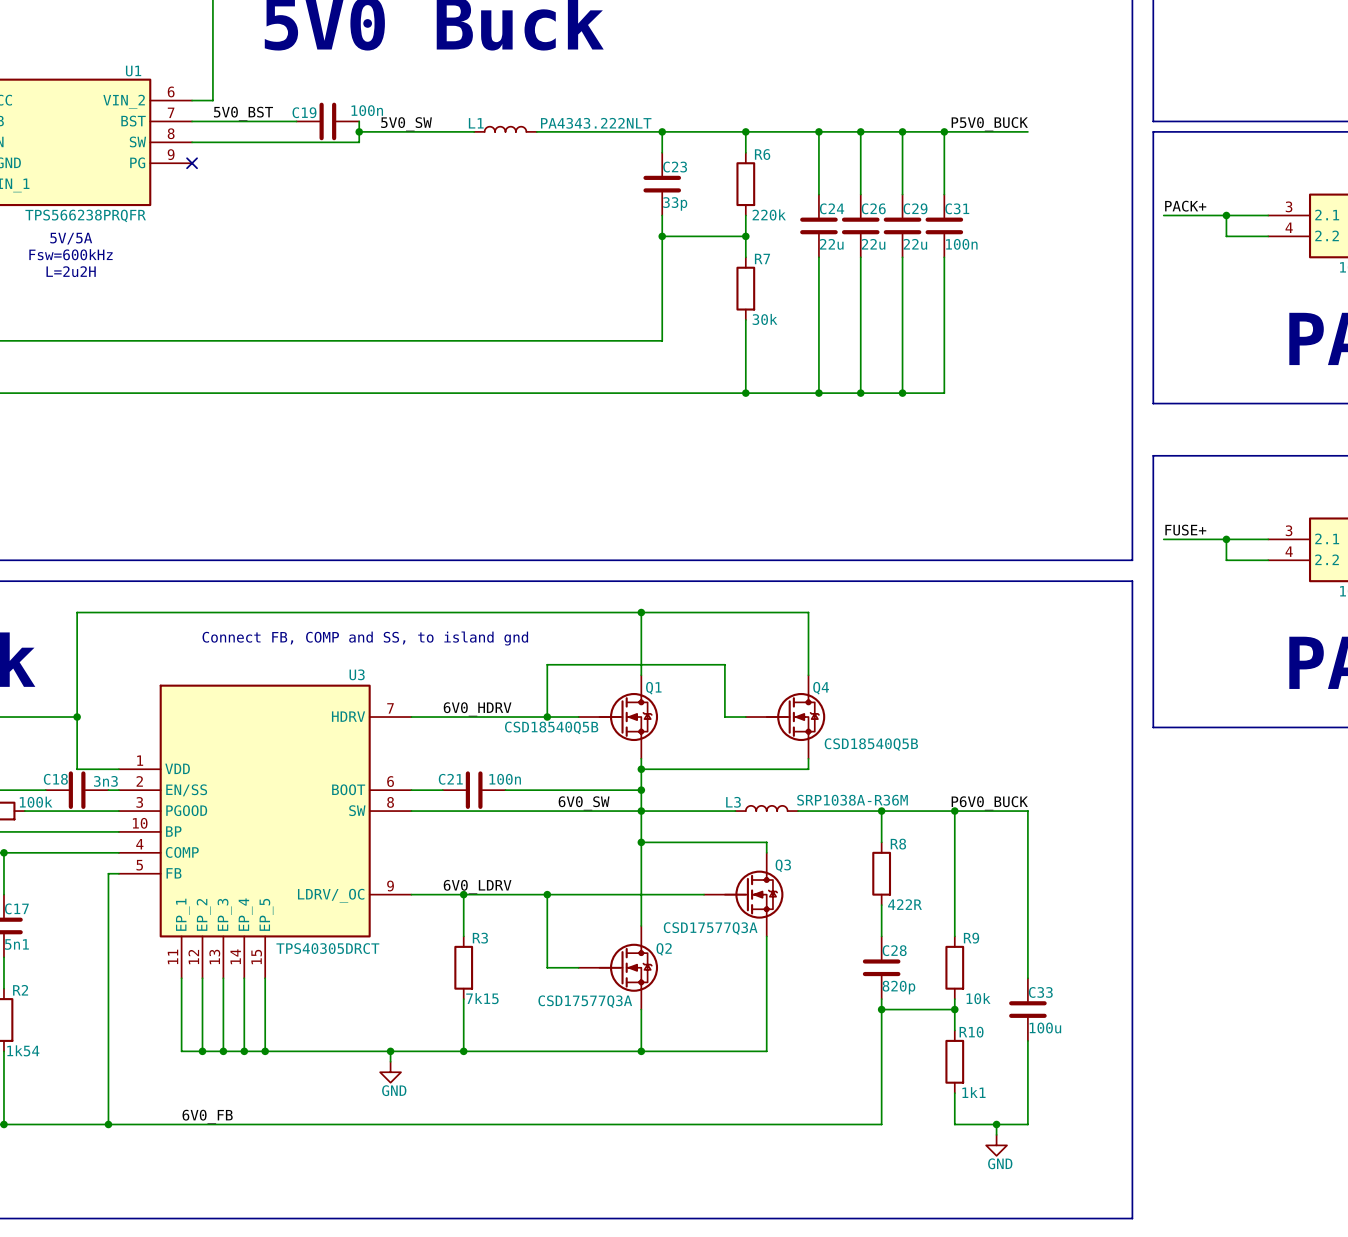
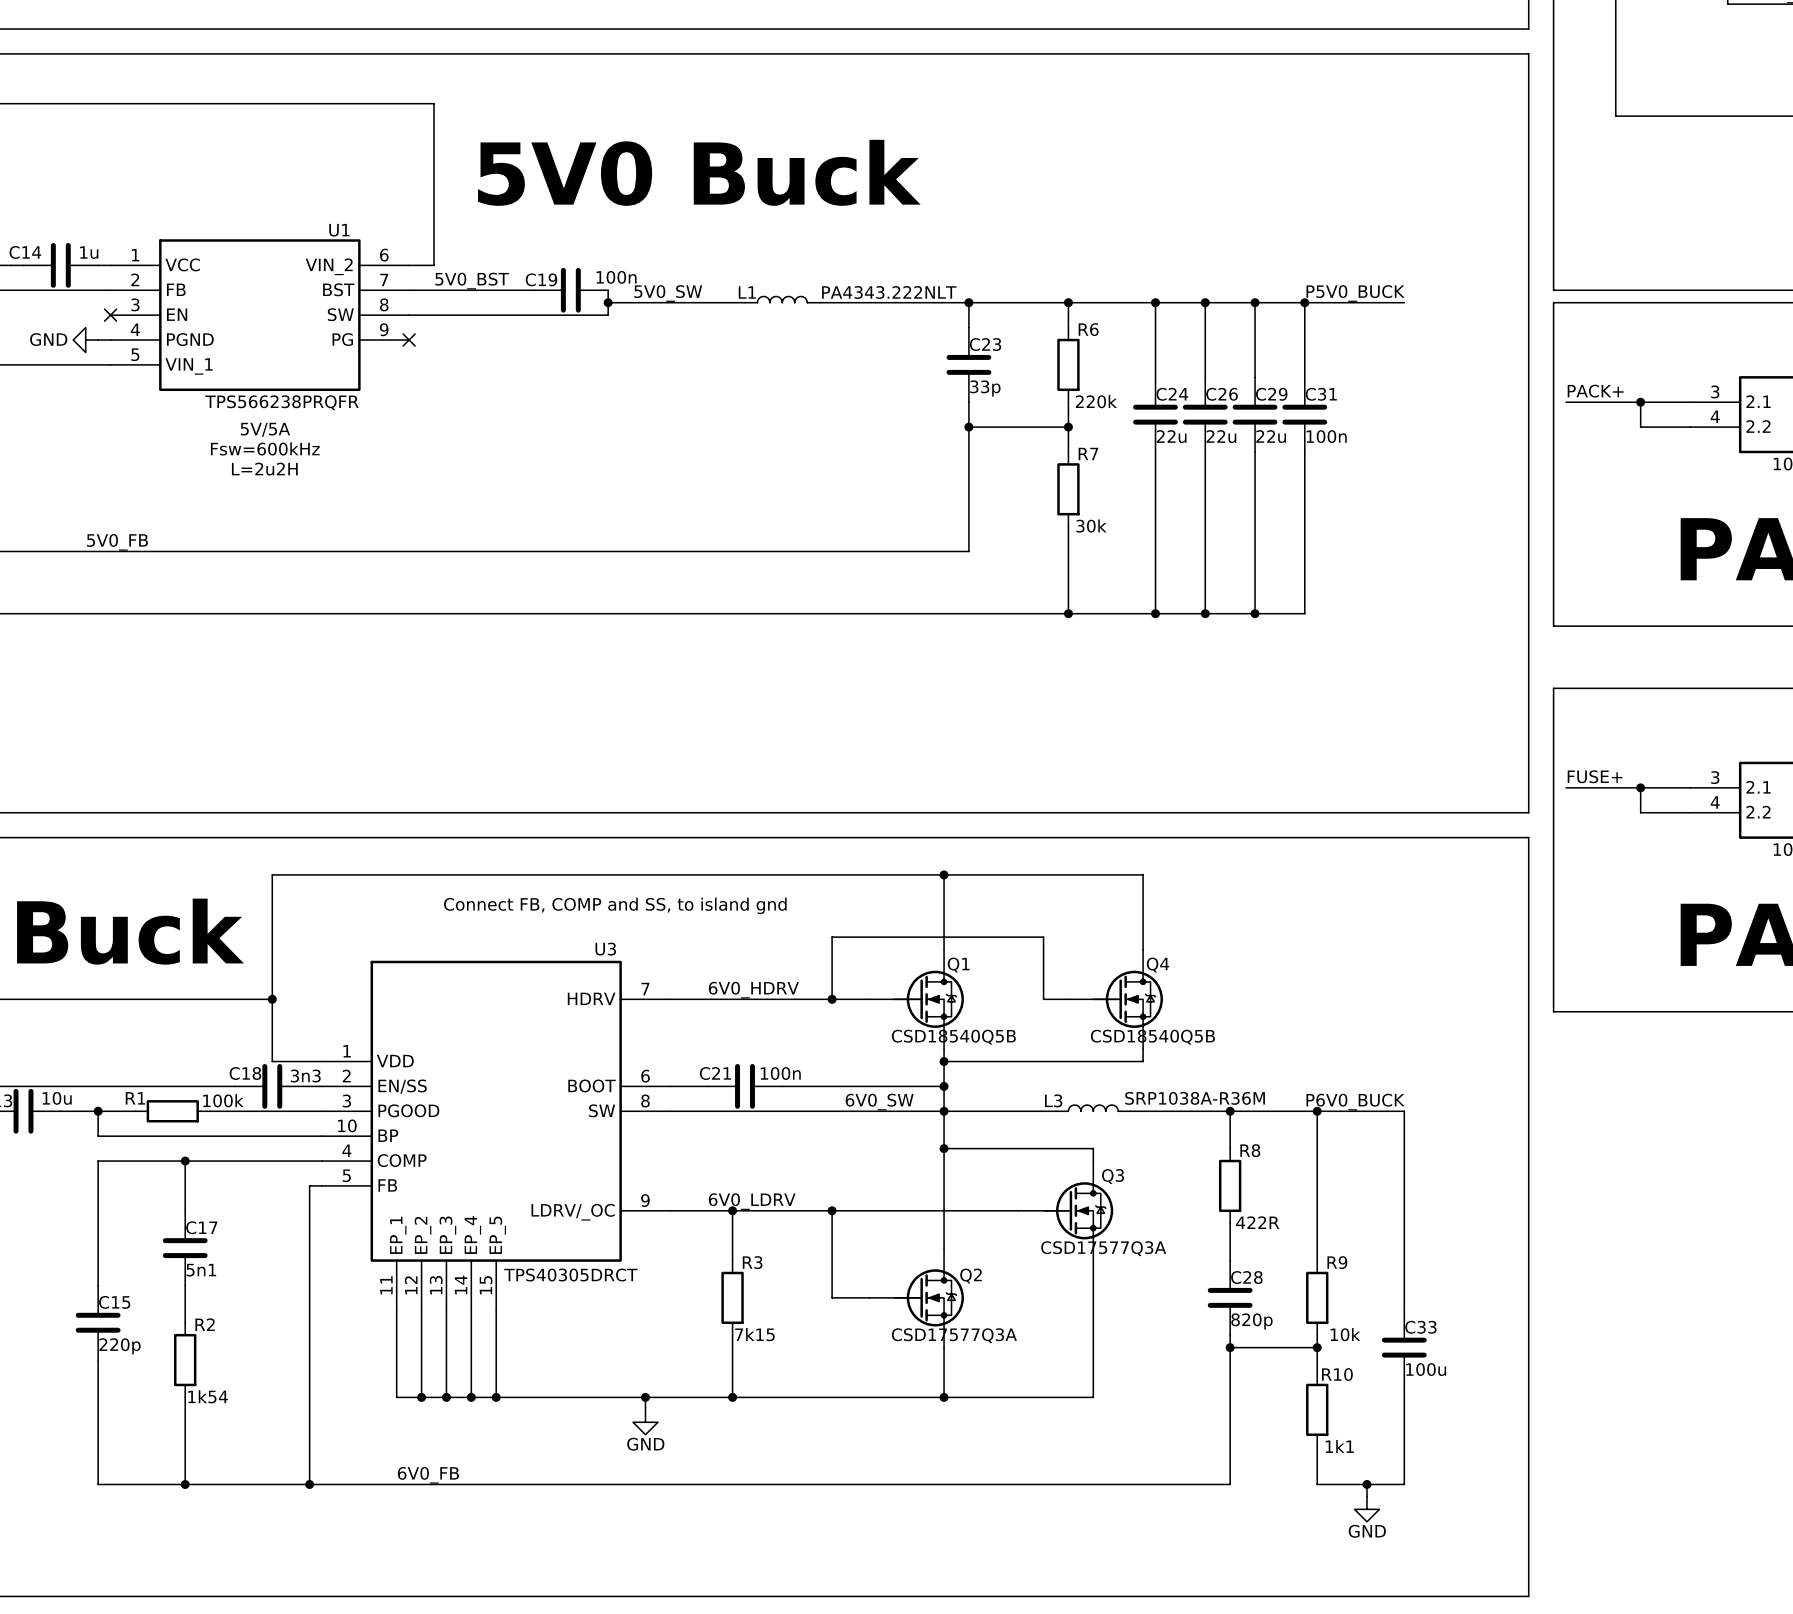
Q1 value position: CSD18540Q5B (551, 727) -> CSD18540Q5B (953, 1037)
Q4 value position: CSD18540Q5B (871, 744) -> CSD18540Q5B (1152, 1037)
Q3 value position: CSD17577Q3A (710, 928) -> CSD17577Q3A (1103, 1248)
Q2 value position: CSD17577Q3A (585, 1001) -> CSD17577Q3A (954, 1335)

